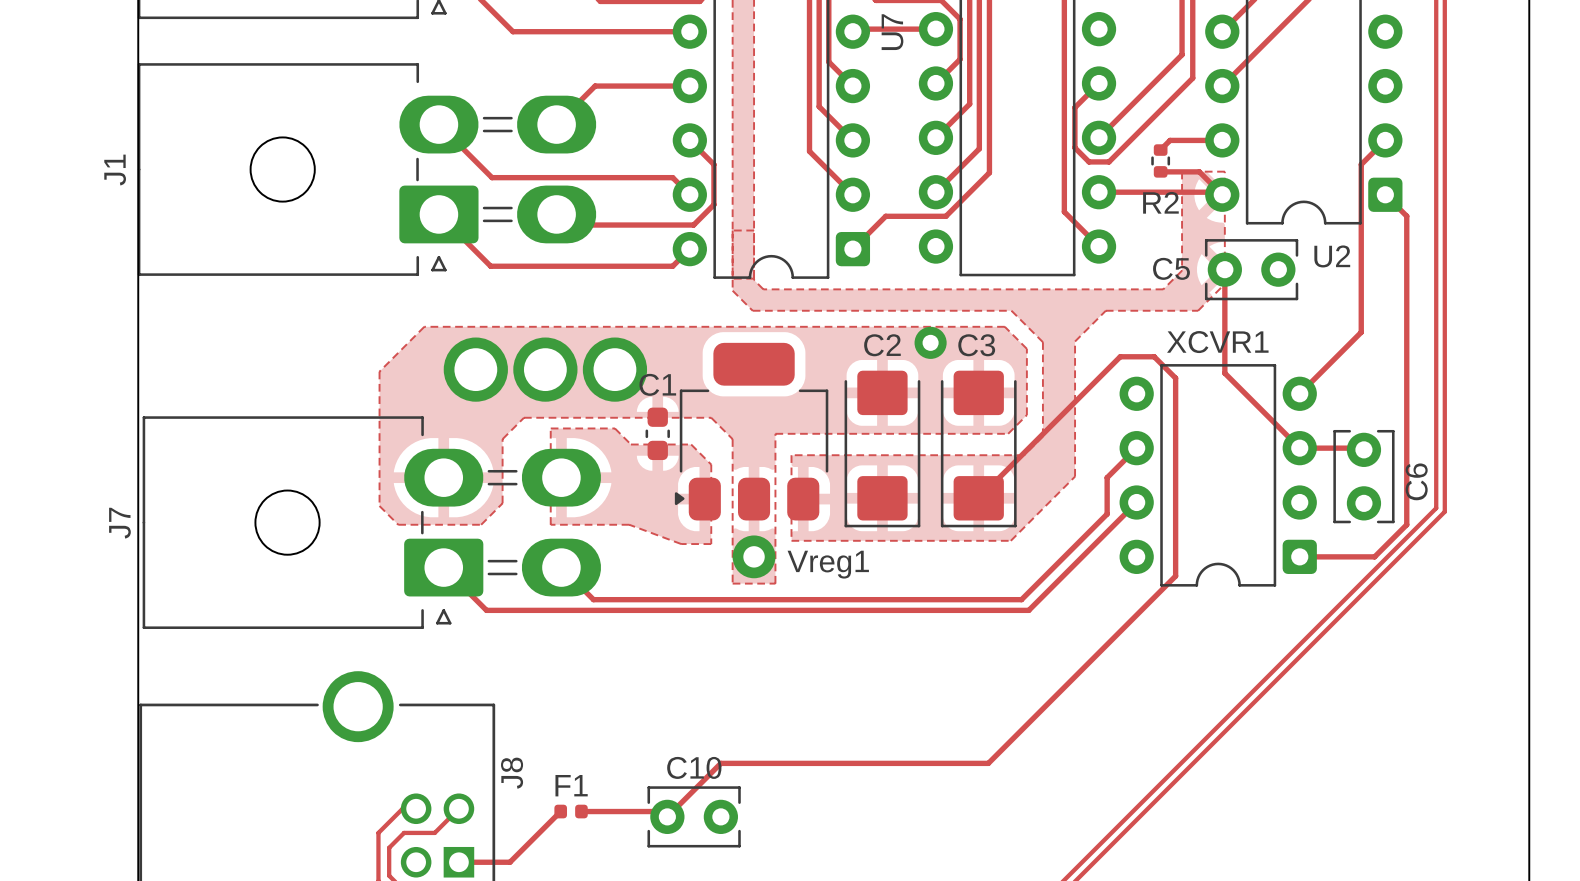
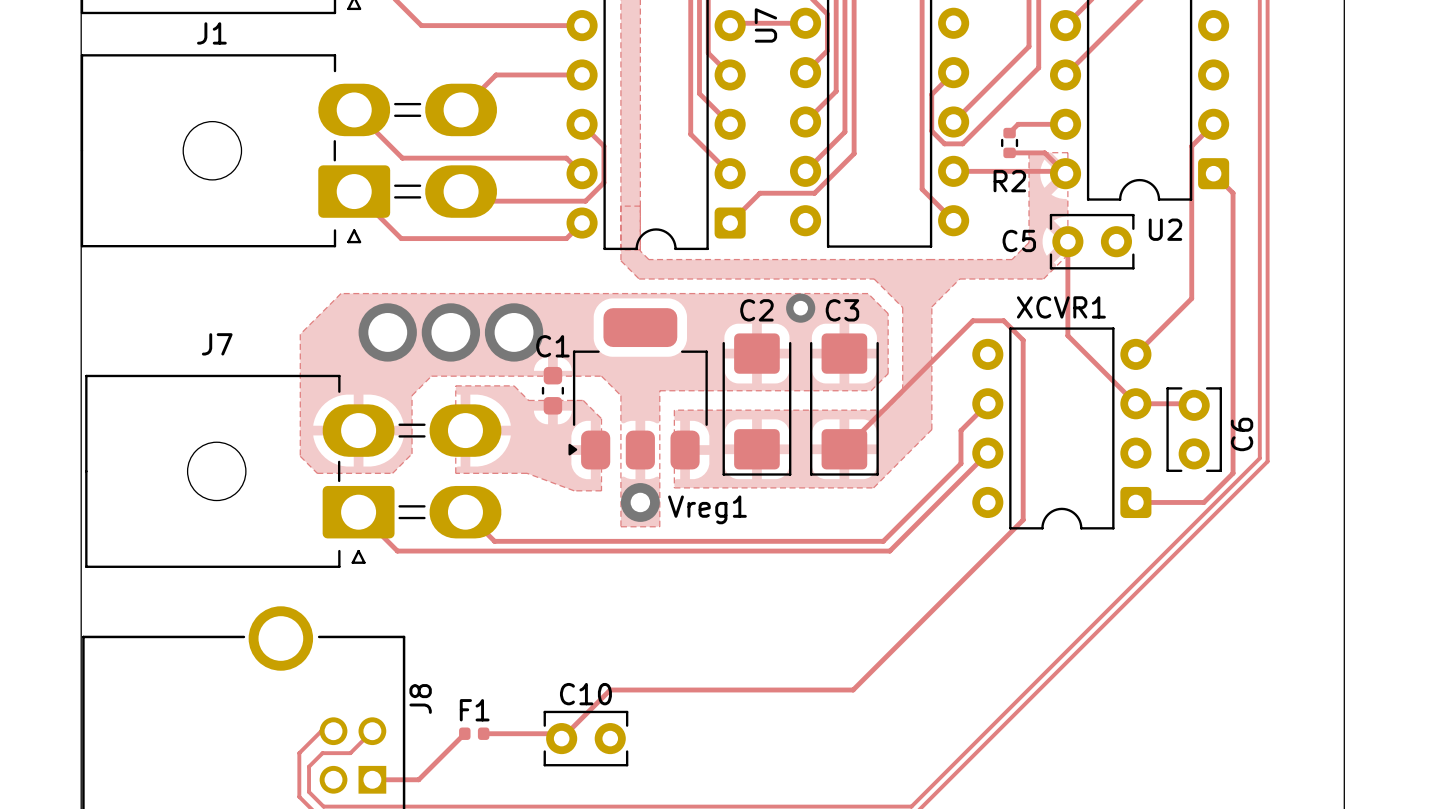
J1 name rotation: 0° (115, 170) -> 90° clockwise (211, 33)
J1 name position: J1 (115, 170) -> J1 (211, 33)
J7 name rotation: 0° (119, 523) -> 90° clockwise (217, 344)
J7 name position: J7 (119, 523) -> J7 (217, 344)

